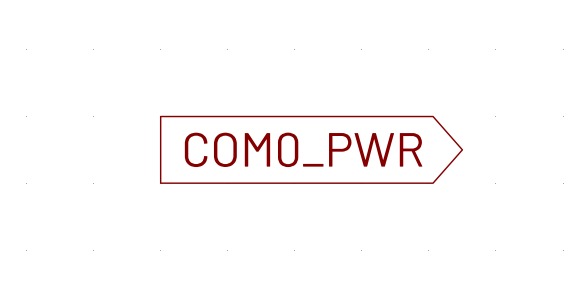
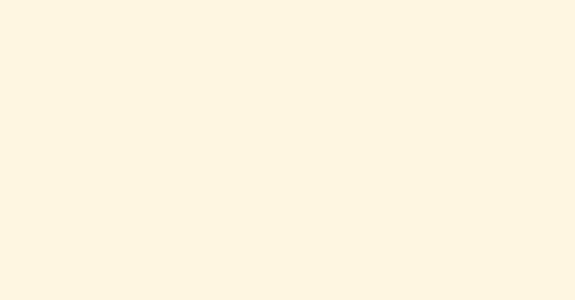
global label: COM0_PWR (303, 149) -> none

